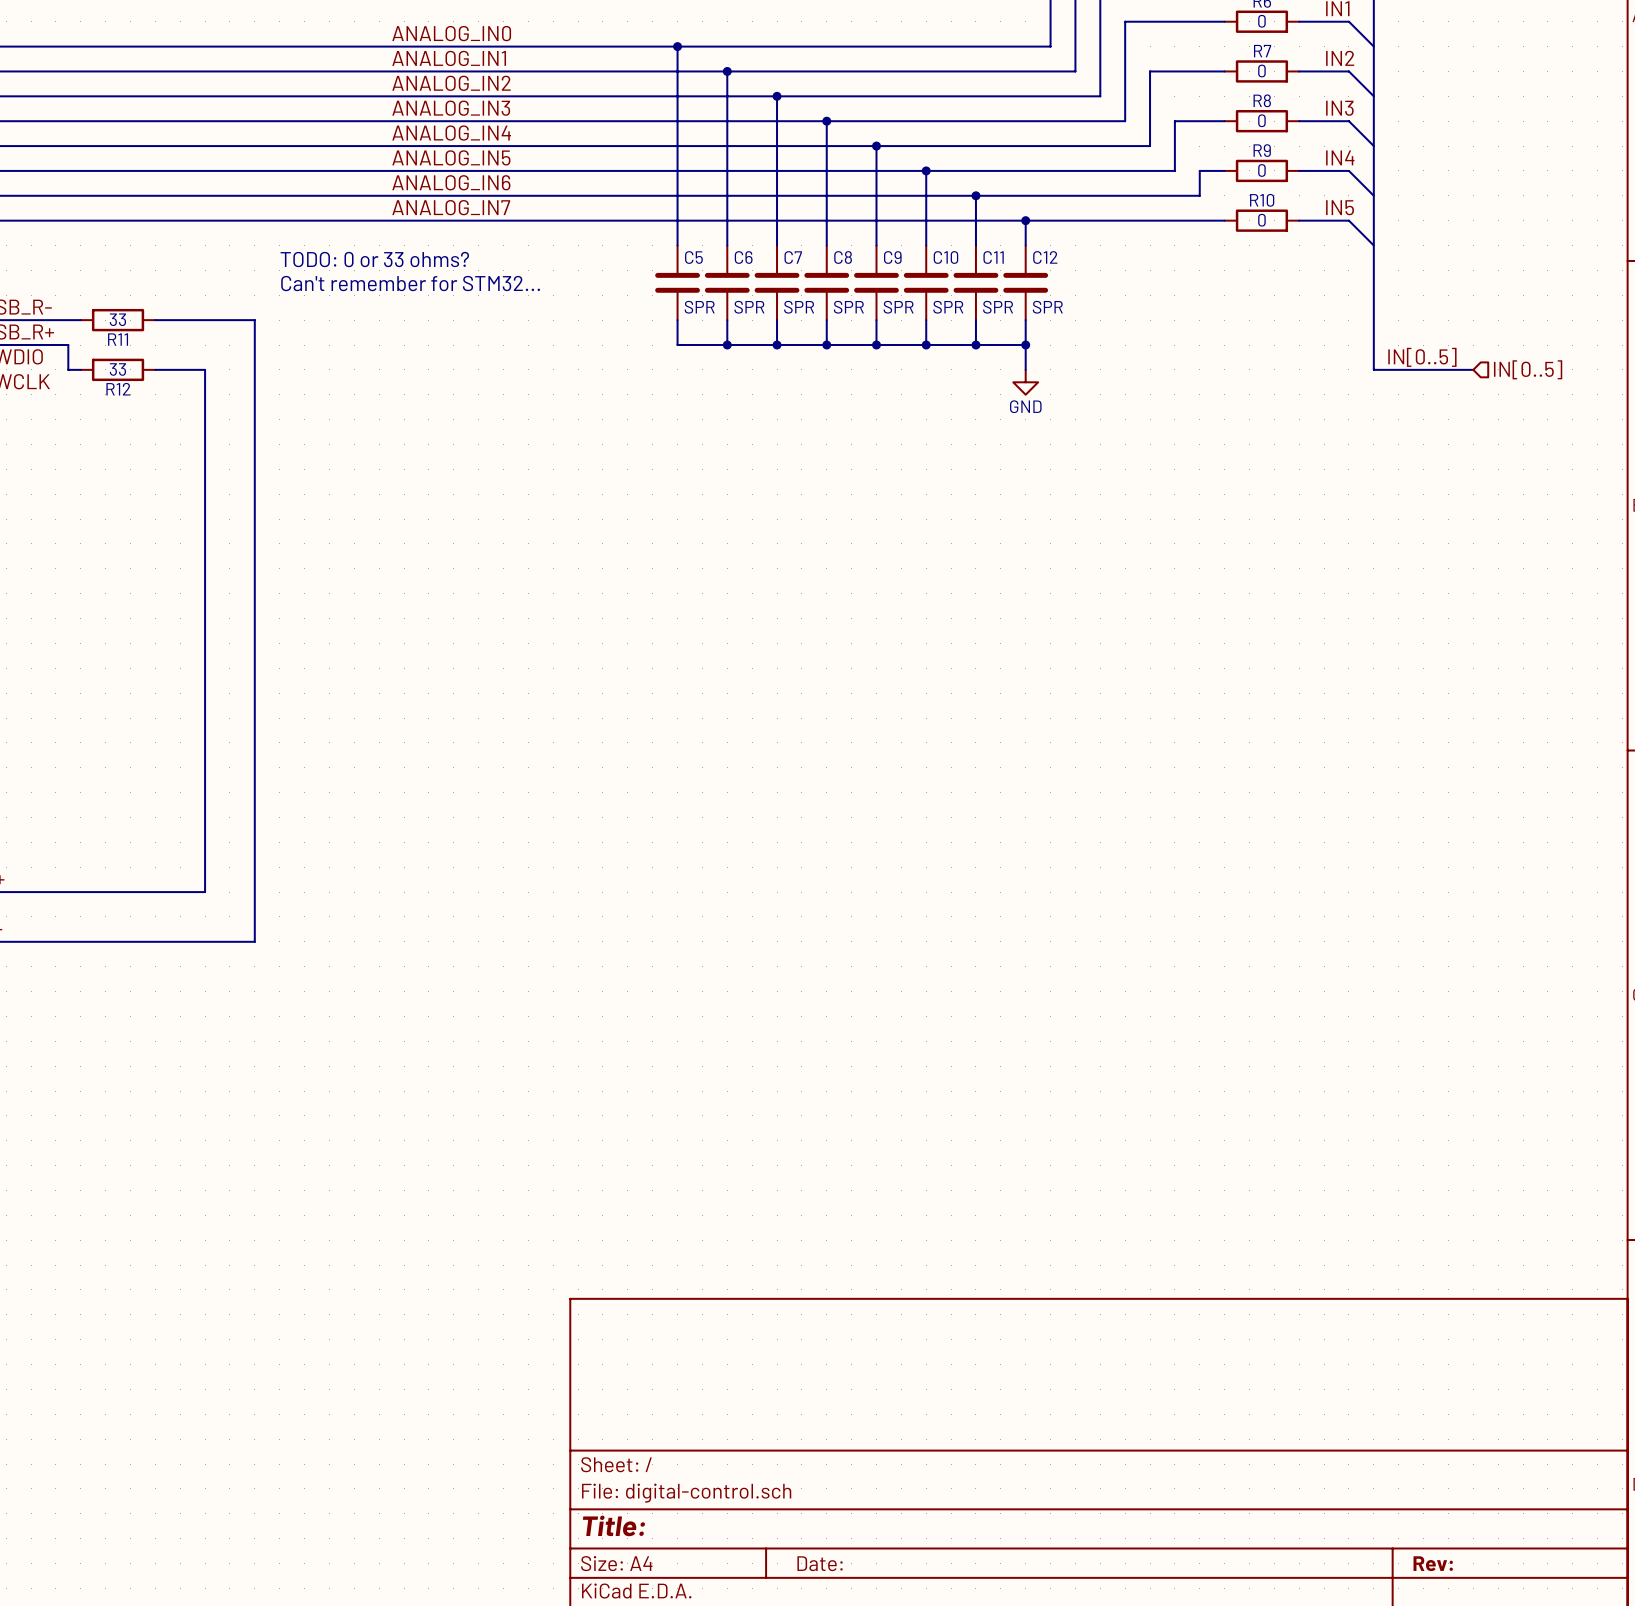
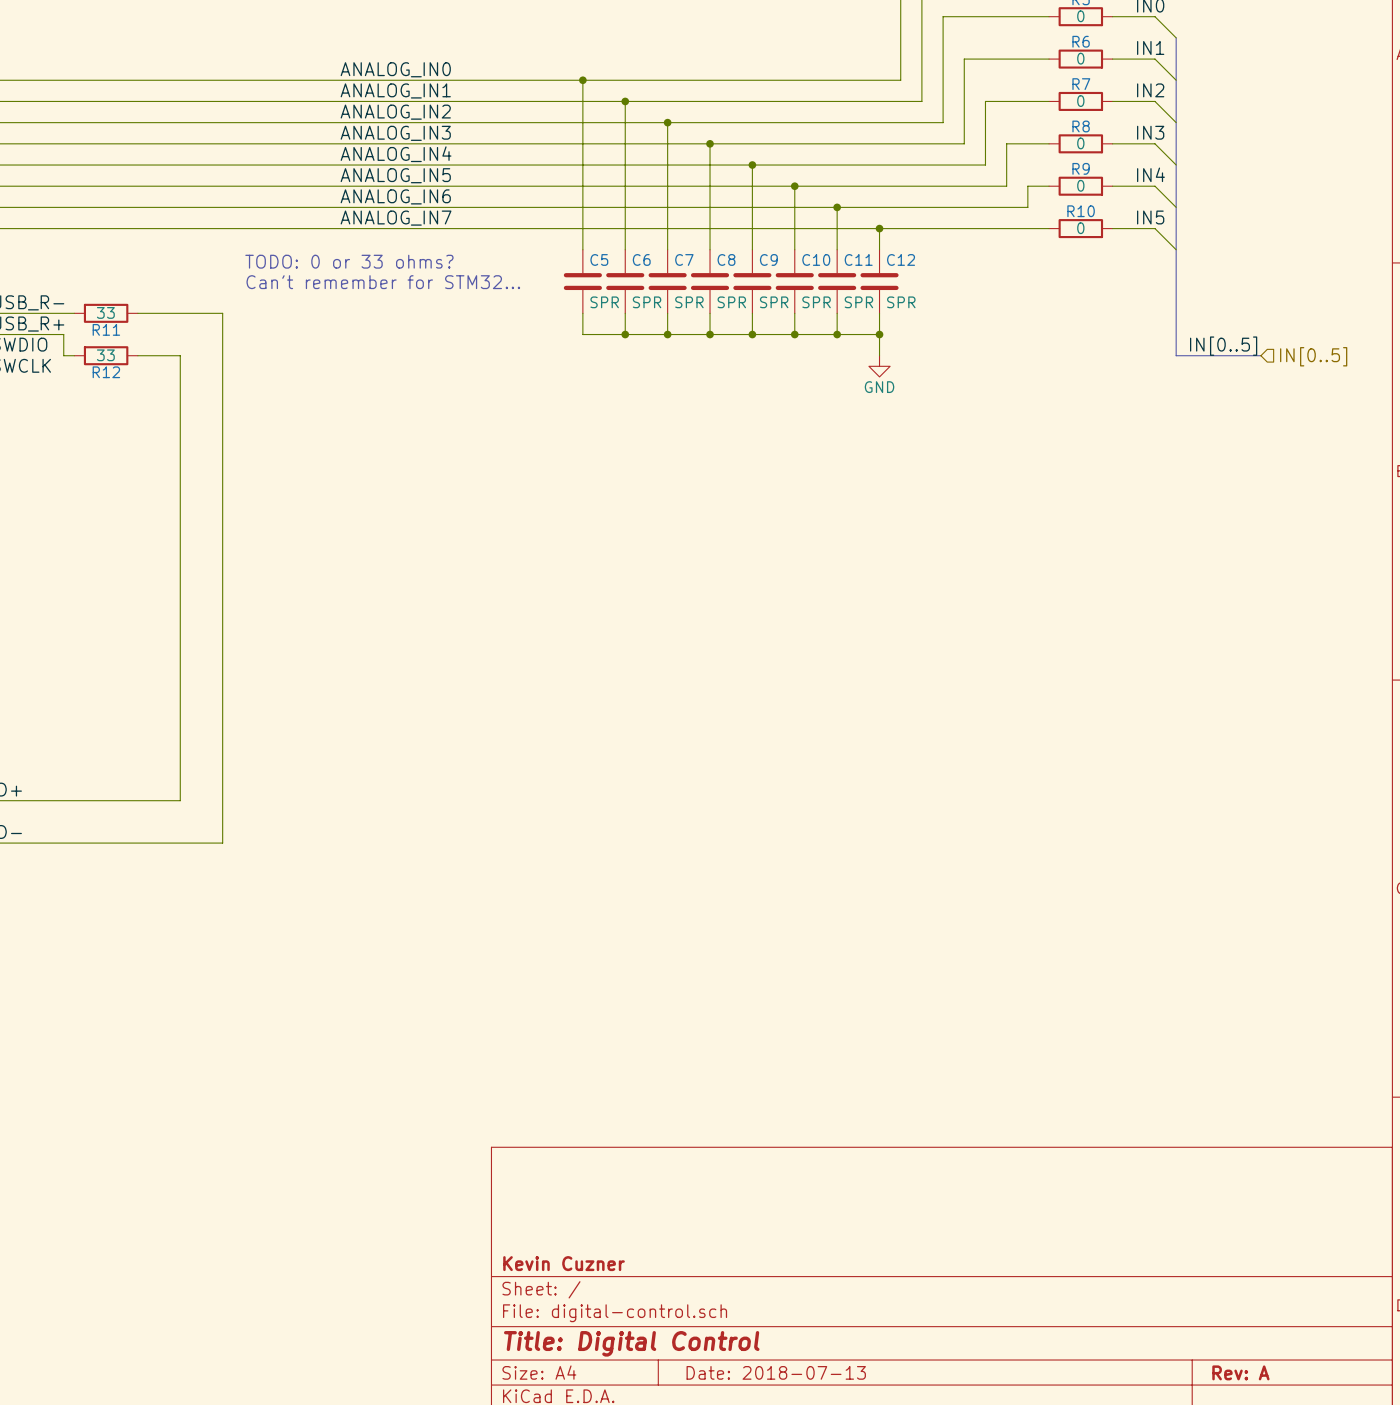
title block: none -> Kevin Cuzner (564, 1263)
title block: Title: (613, 1525) -> Title: Digital Control (631, 1343)
title block: Date: (820, 1563) -> Date: 2018-07-13 (776, 1372)
title block: Rev: (1433, 1563) -> Rev: A (1240, 1372)

